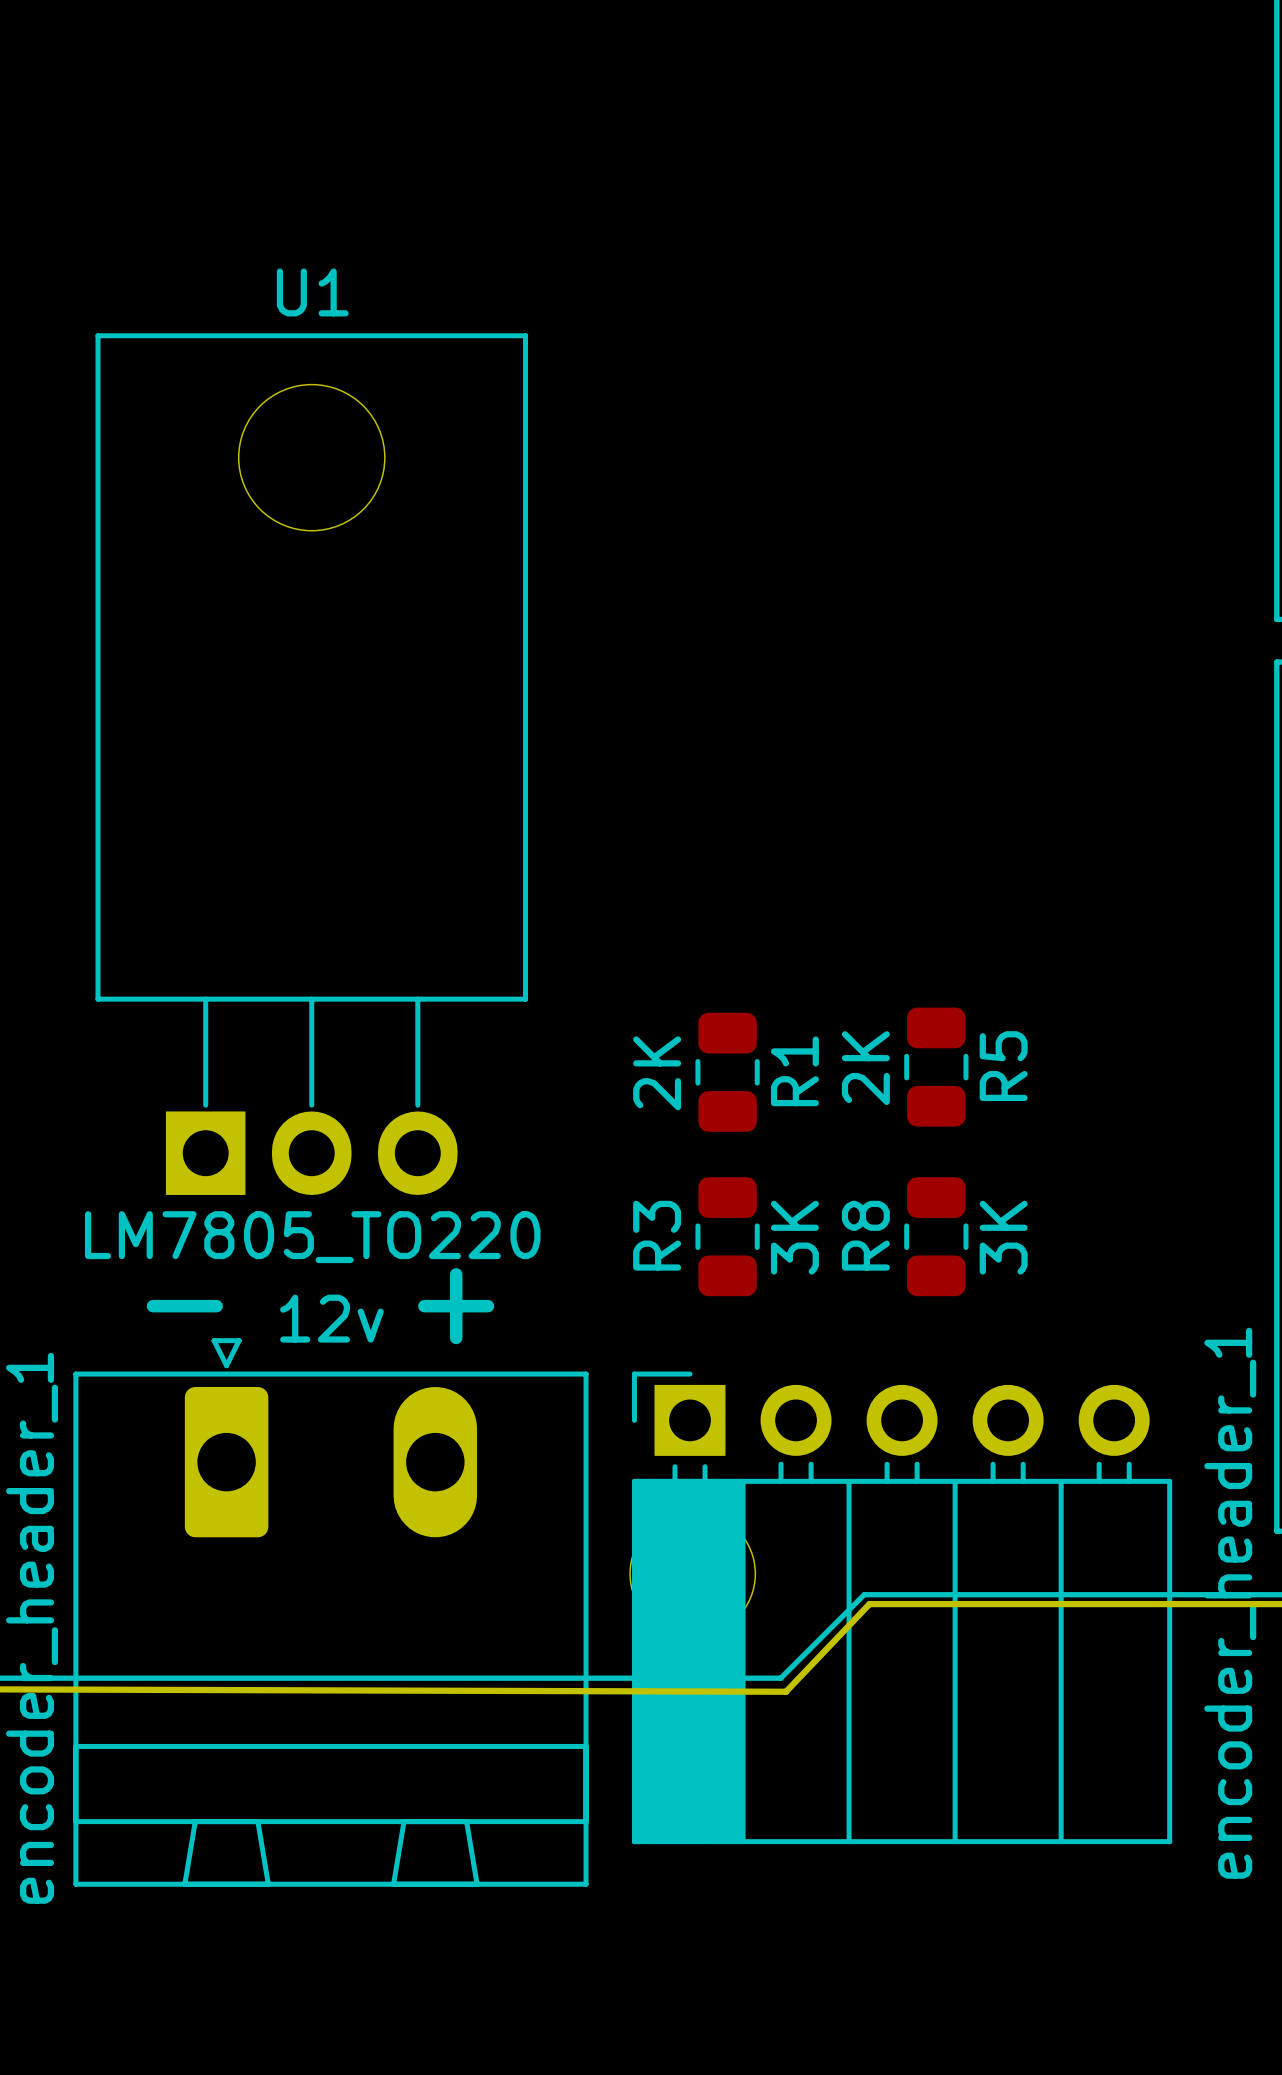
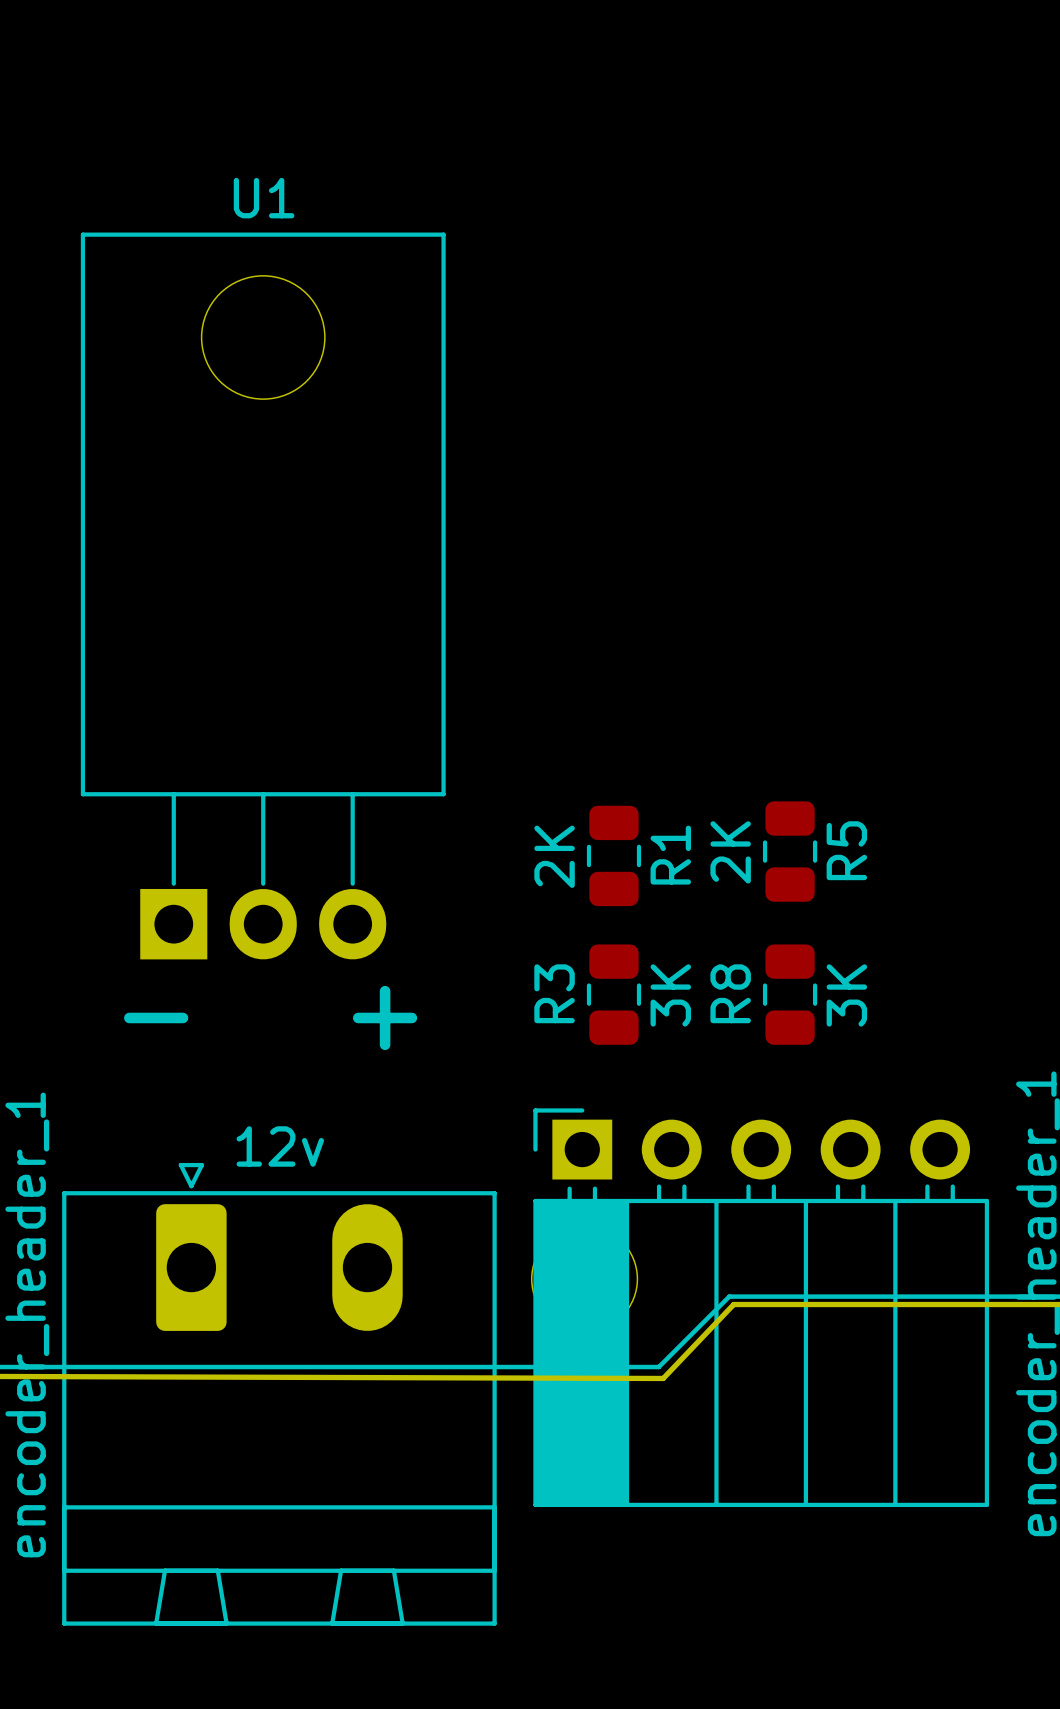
U1 value: LM7805_TO220 (312, 1237) -> none
text position: - (184, 1306) -> - (156, 1017)
text position: + (456, 1306) -> + (385, 1017)
part position: (330, 1612) -> (279, 1394)

